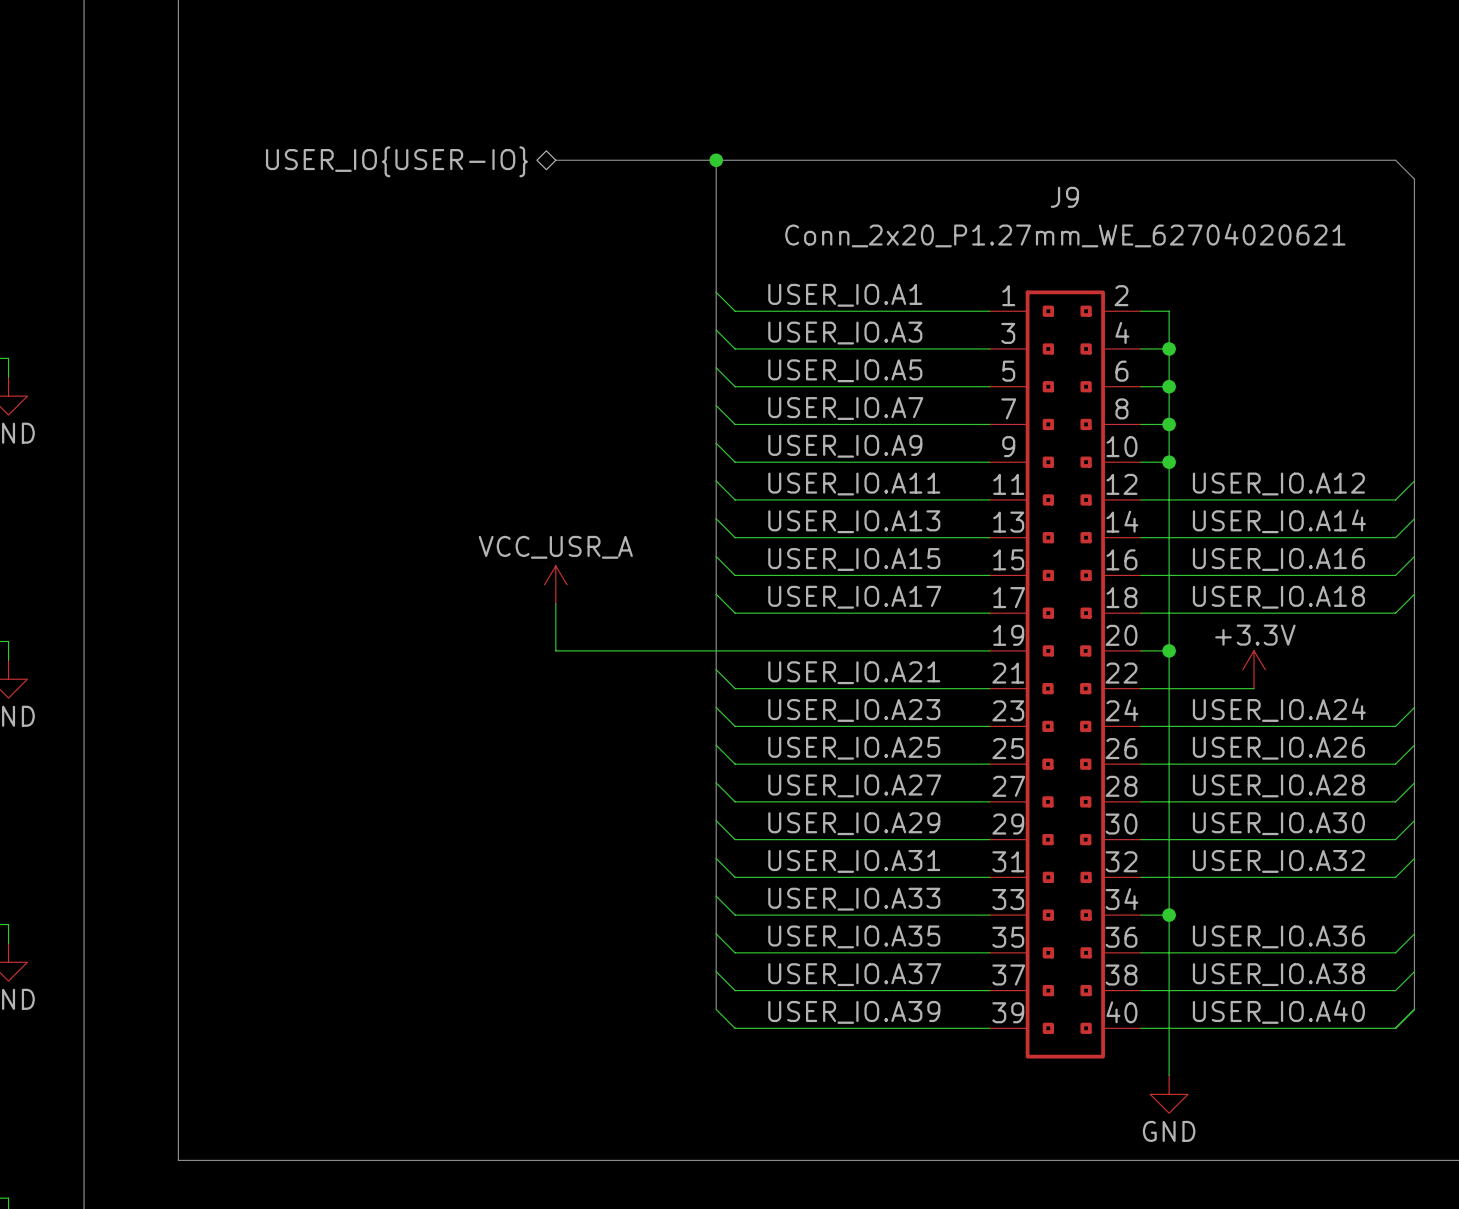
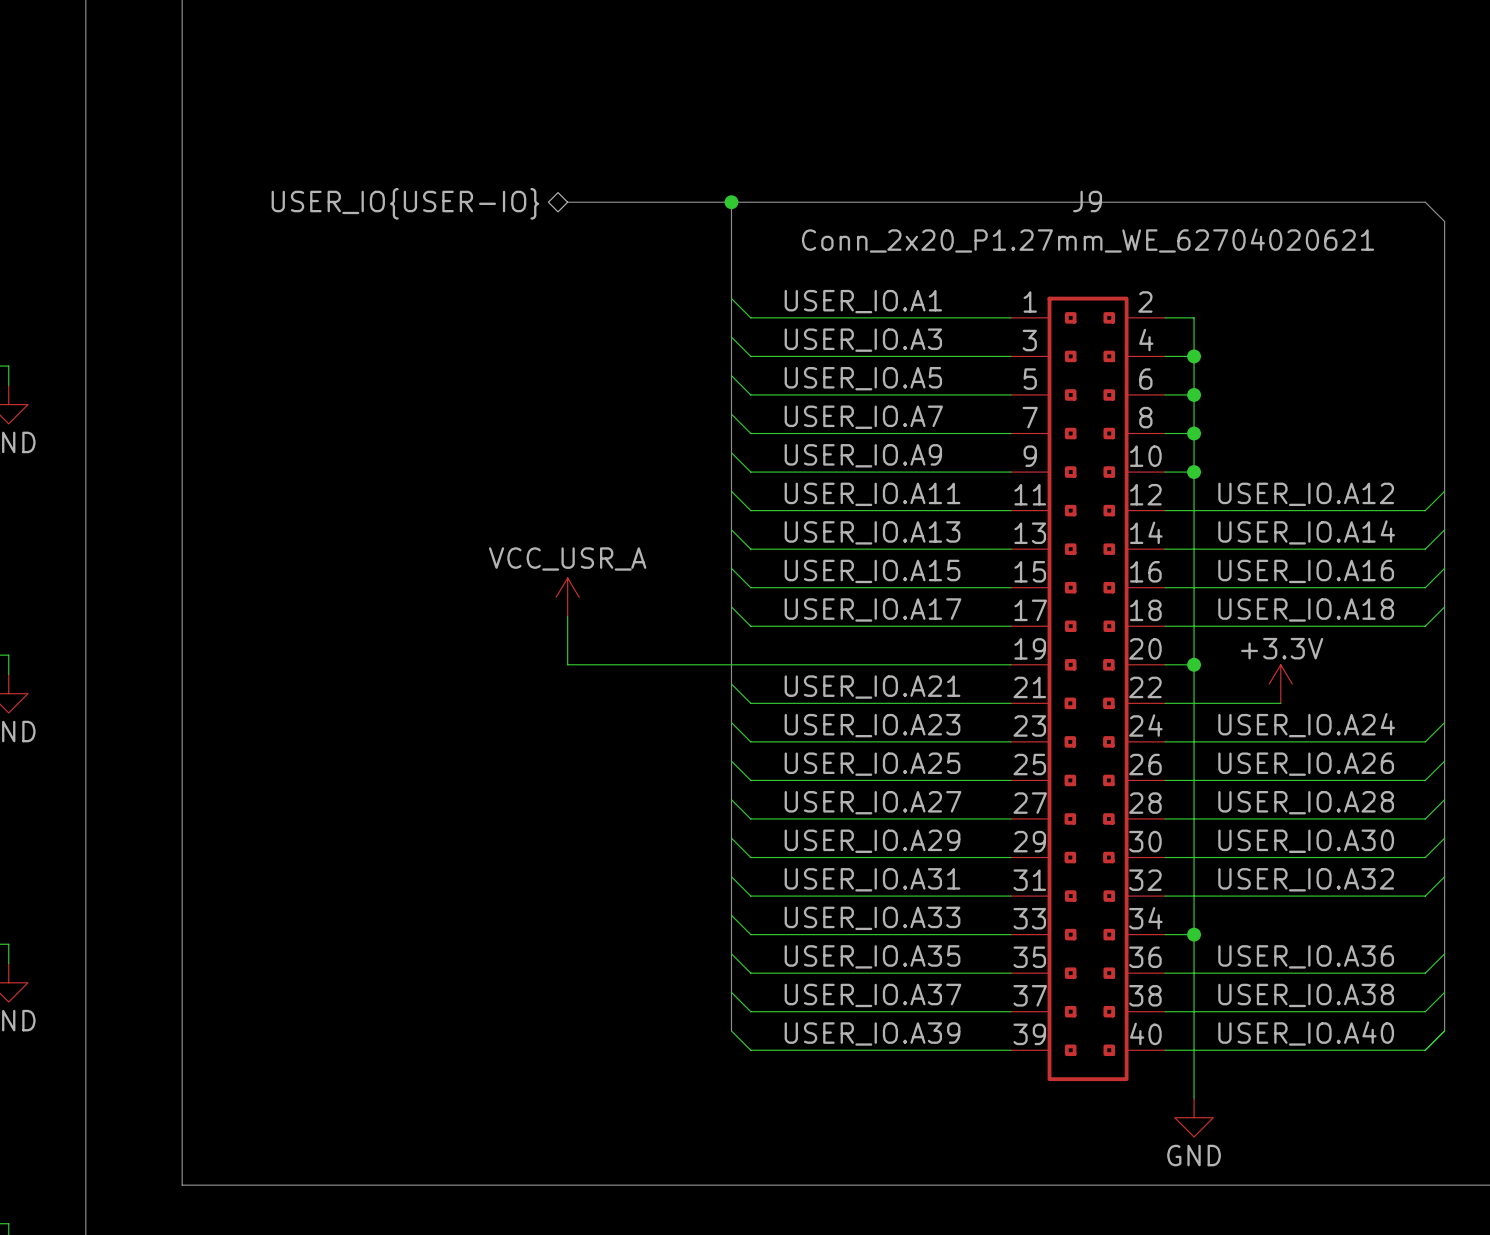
bus: (555, 160) (1395, 160) (1414, 179) (1414, 216) -> (567, 202) (1425, 202) (1444, 221)
bus: (716, 160) (716, 198) -> none
junction position: (716, 160) -> (731, 202)
hierarchical label position: USER_IO{USER-IO} (396, 161) -> USER_IO{USER-IO} (405, 203)

